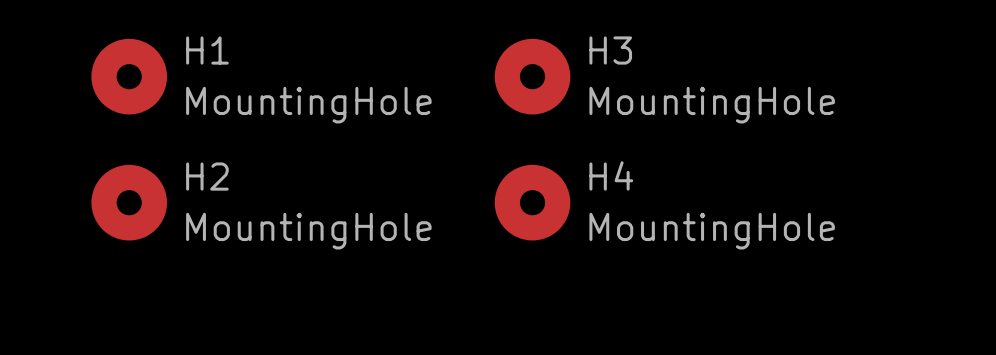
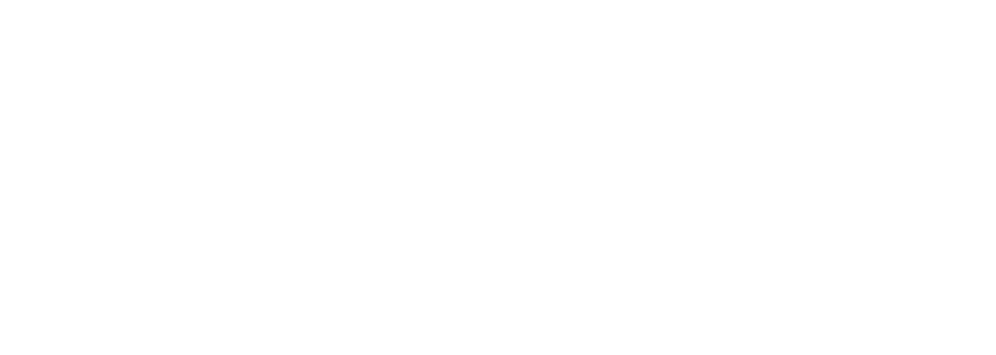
H1: MountingHole (129, 76) -> none
H3: MountingHole (532, 76) -> none
H2: MountingHole (129, 202) -> none
H4: MountingHole (532, 202) -> none

